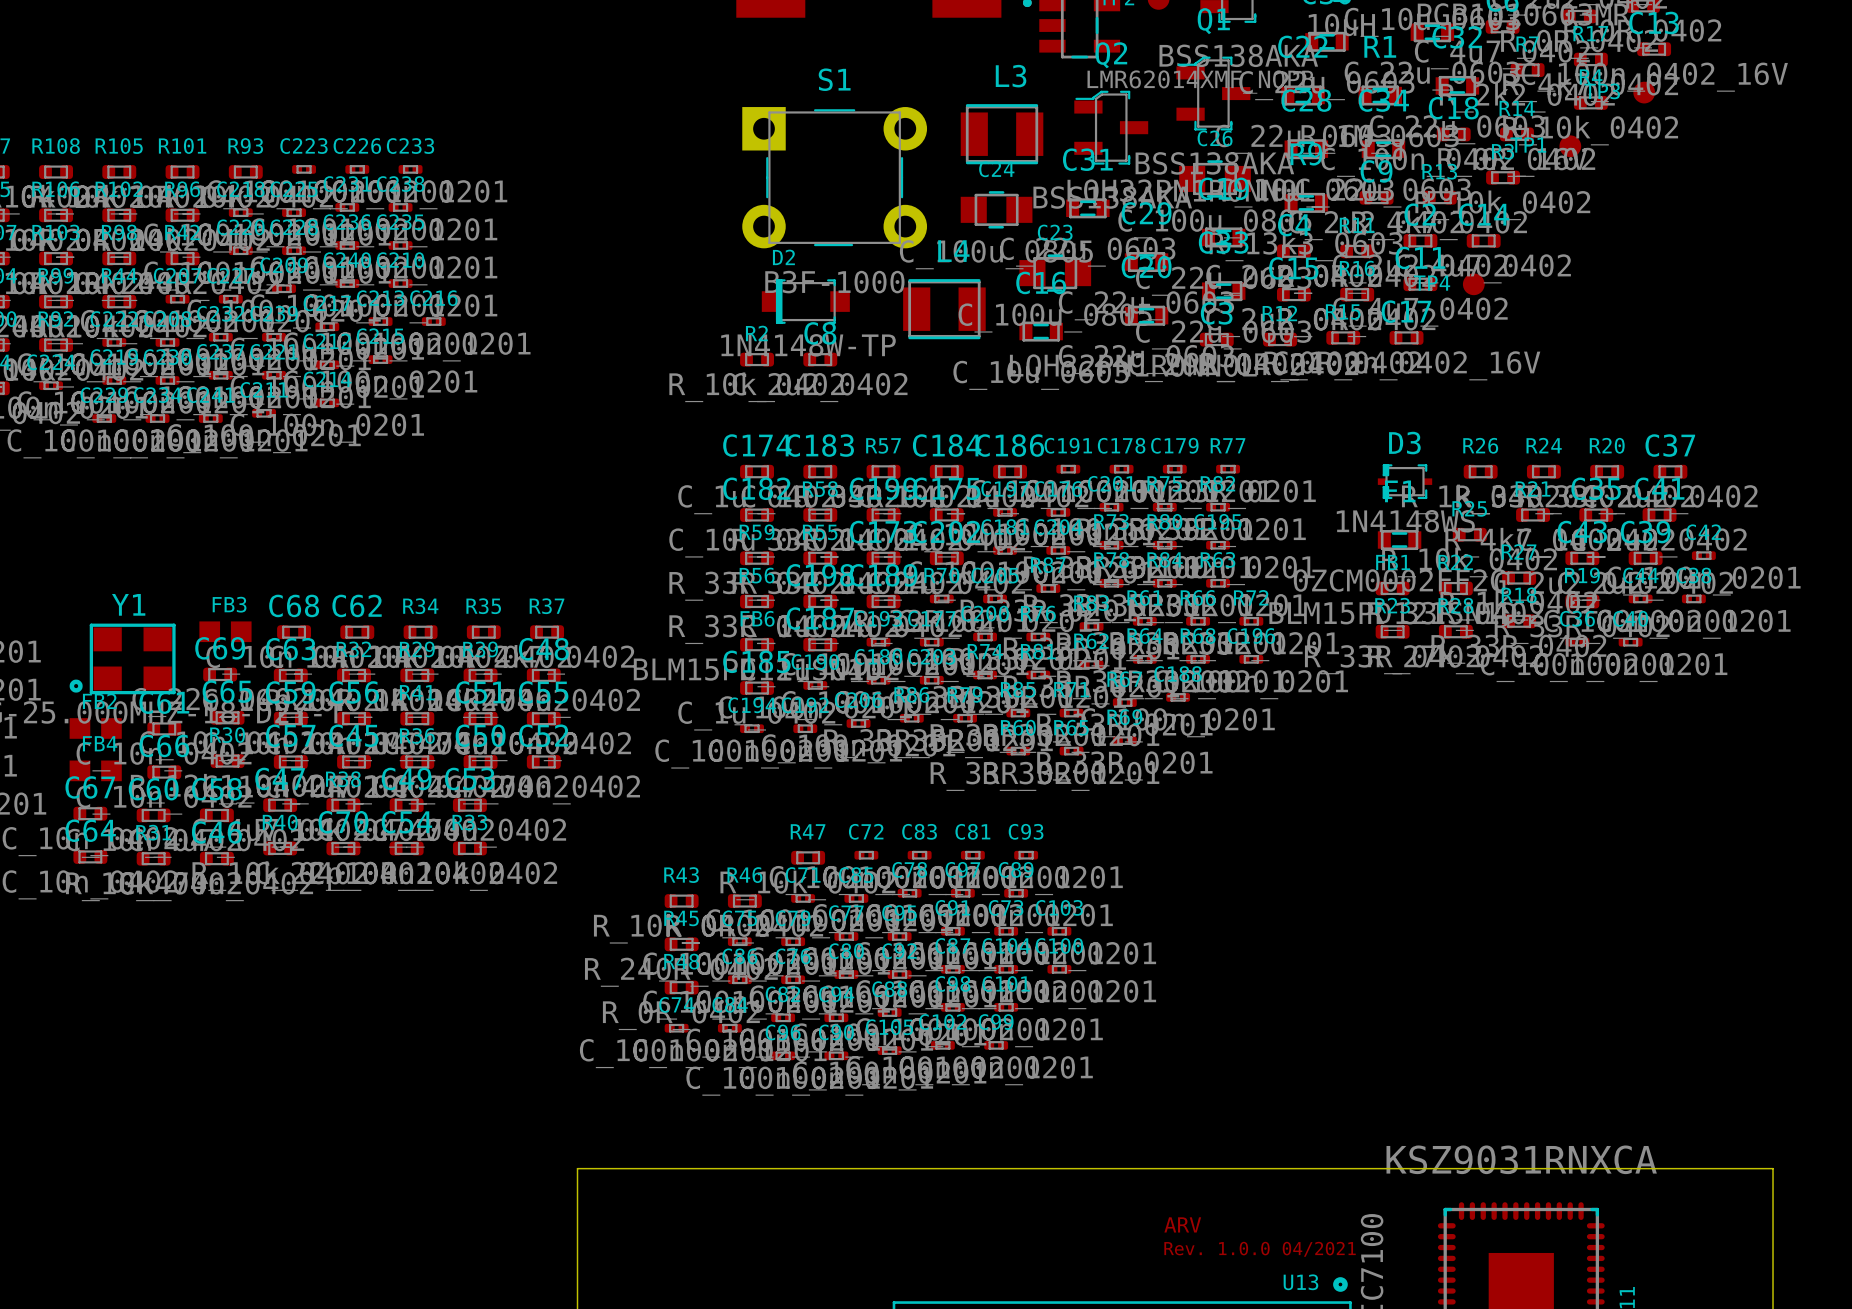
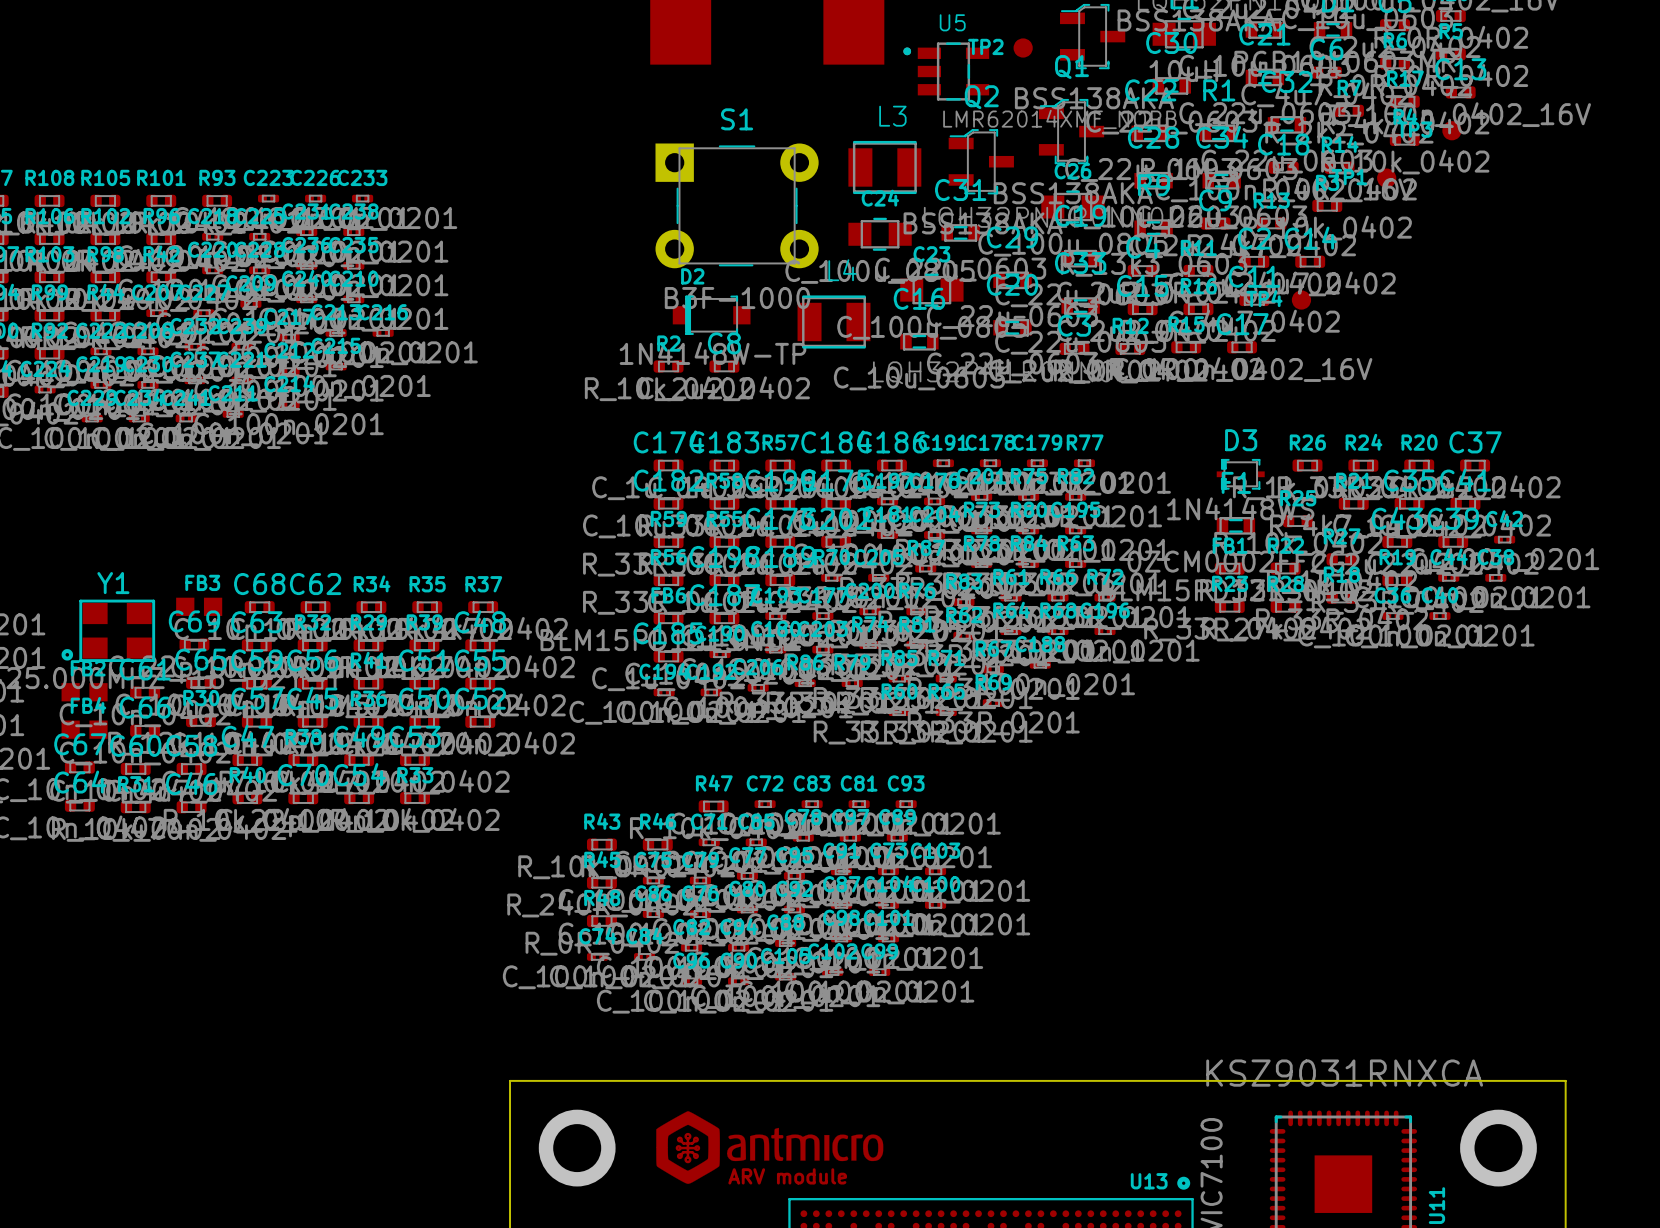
drawing: none -> [656, 1111, 884, 1184]
text: ARV (1182, 1224) -> none
via: none -> (577, 1148)
via: none -> (1498, 1148)
text: Rev. 1.0.0 04/2021 (1260, 1249) -> none
text: none -> ARV module (787, 1176)

